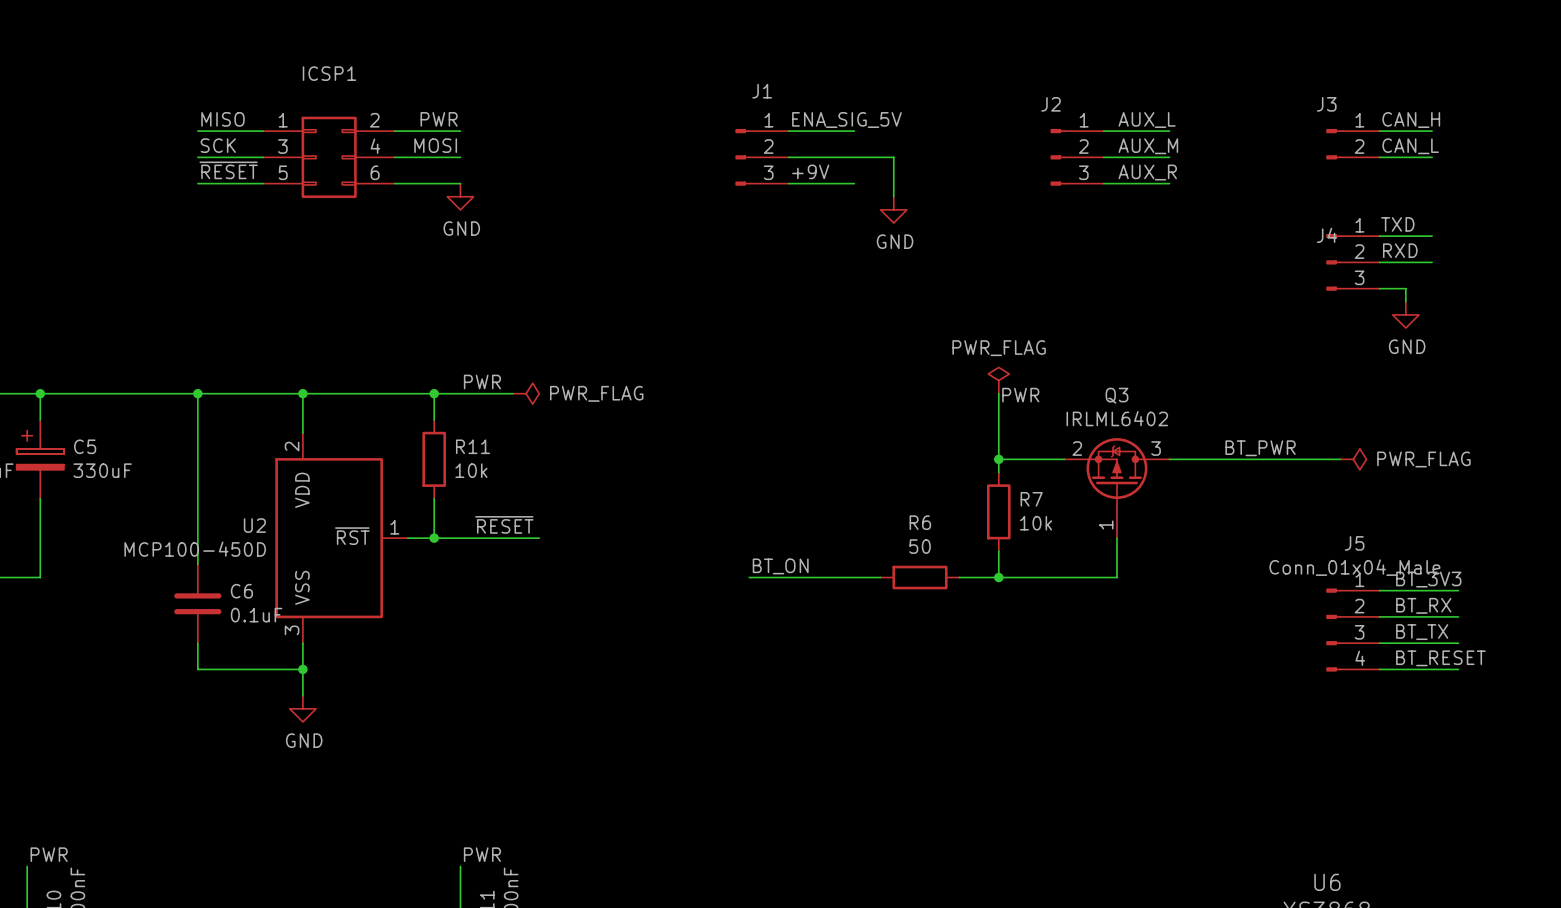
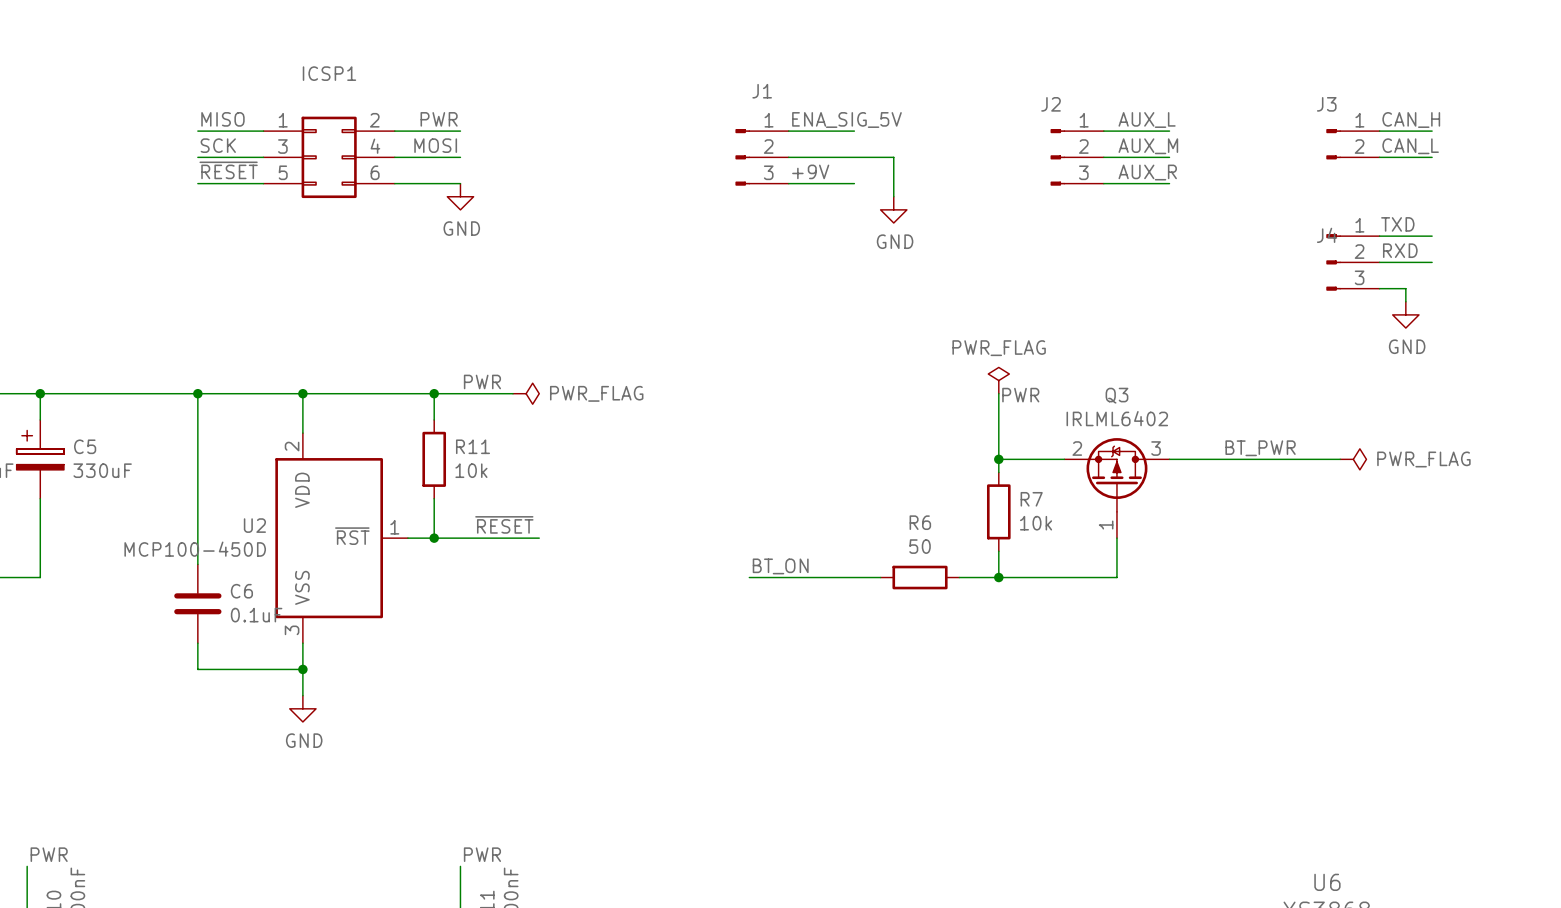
label: BT_3V3 (1428, 579) -> none
wire: (1379, 590) (1458, 590) -> none
label: BT_RX (1423, 605) -> none
wire: (1379, 616) (1458, 616) -> none
J5: Conn_01x04_Male (1352, 630) -> none
label: BT_TX (1422, 632) -> none
wire: (1379, 643) (1458, 643) -> none
label: BT_RESET (1440, 658) -> none
wire: (1379, 669) (1458, 669) -> none

